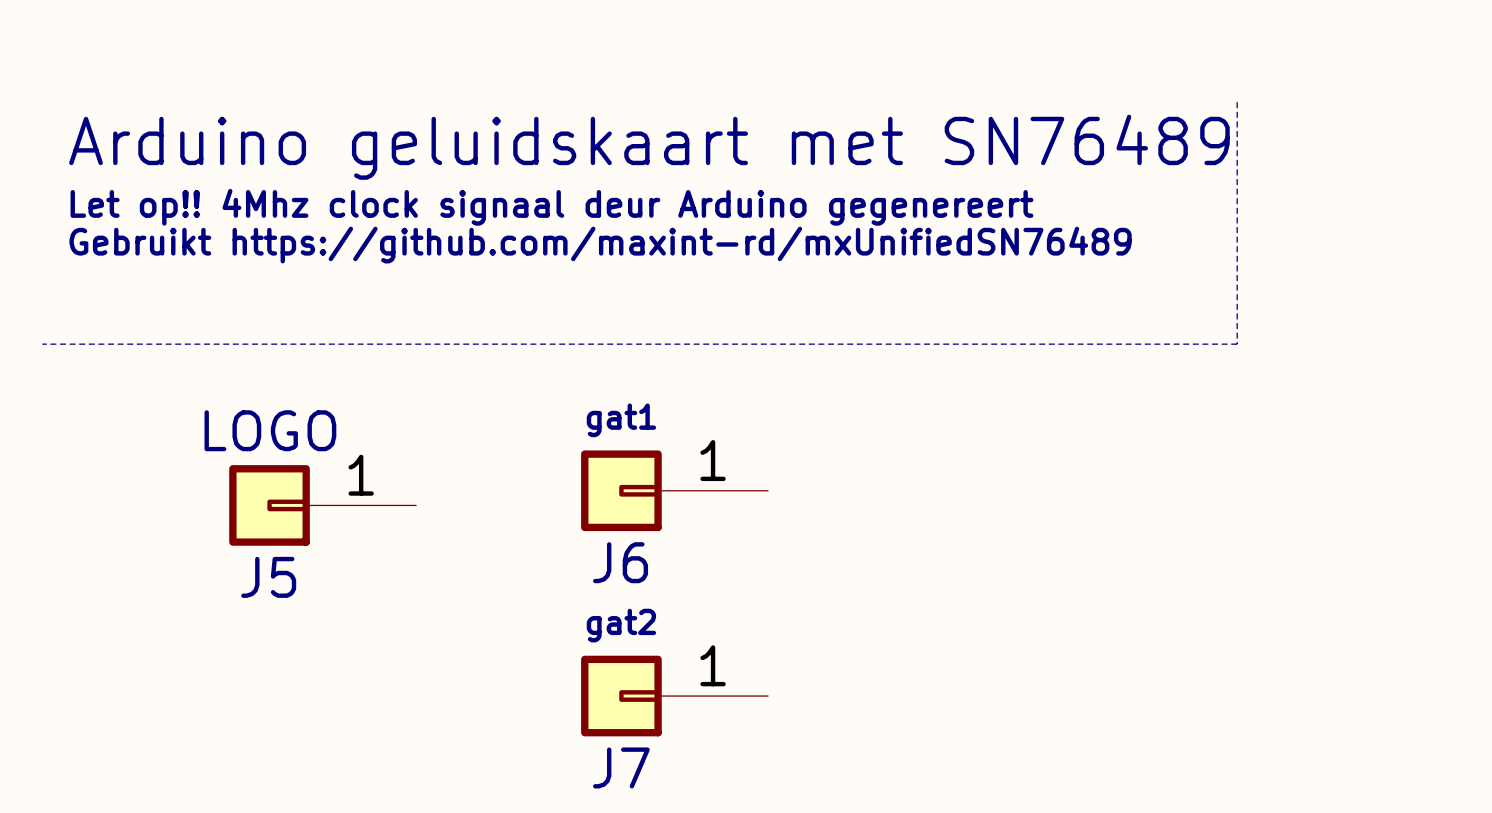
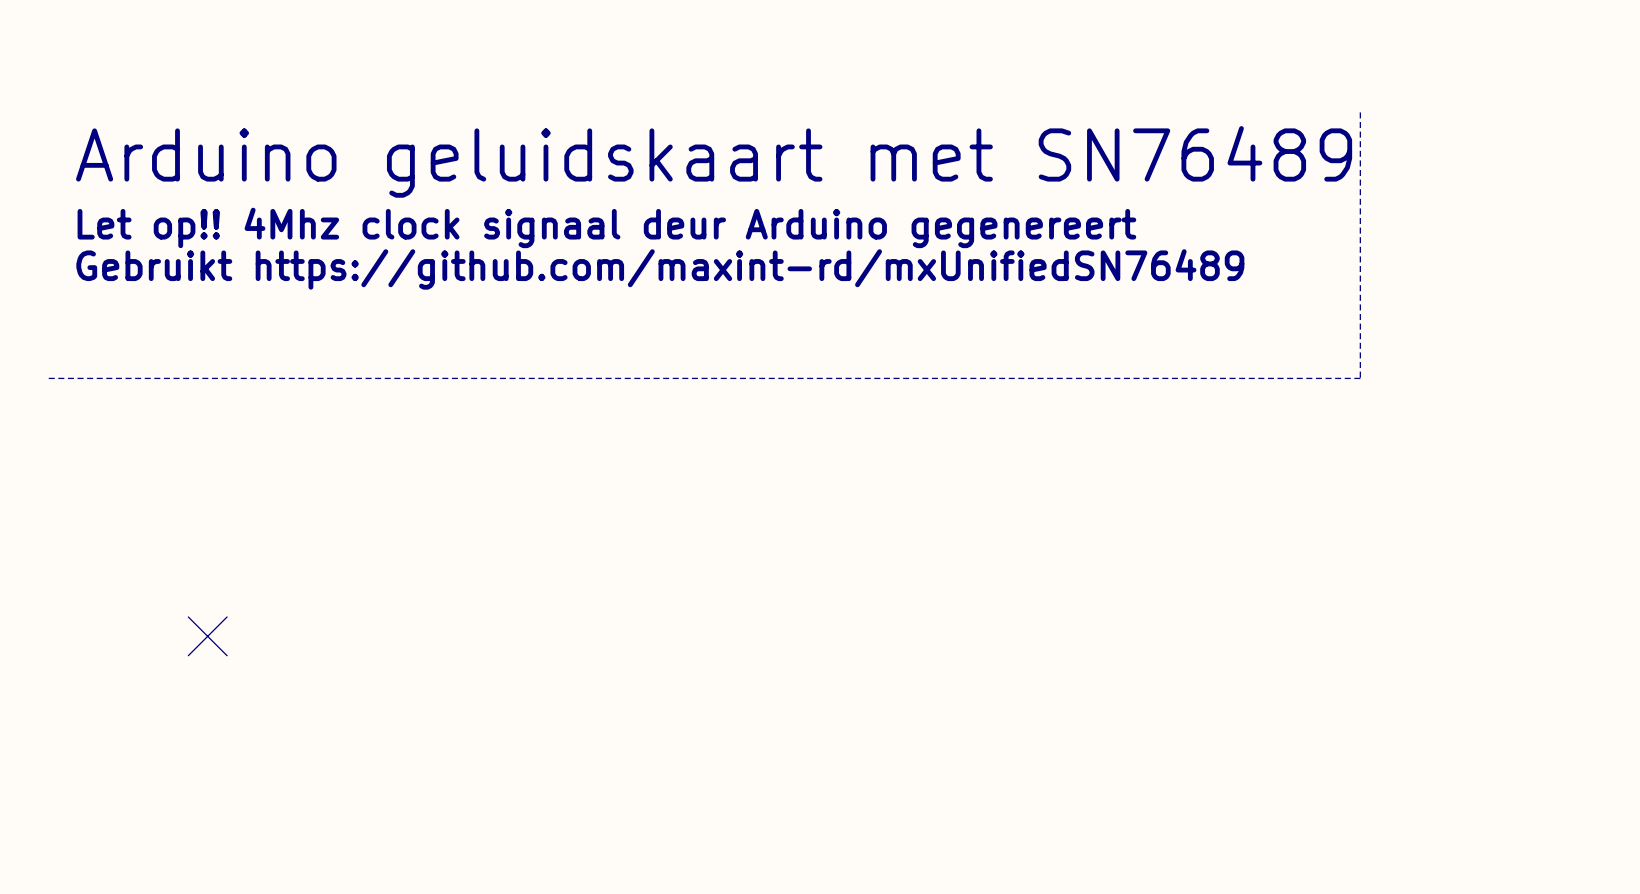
J6: gat1 (674, 490) -> none
J5: LOGO (322, 505) -> none
no-connect mark: none -> (207, 636)
J7: gat2 (674, 696) -> none

